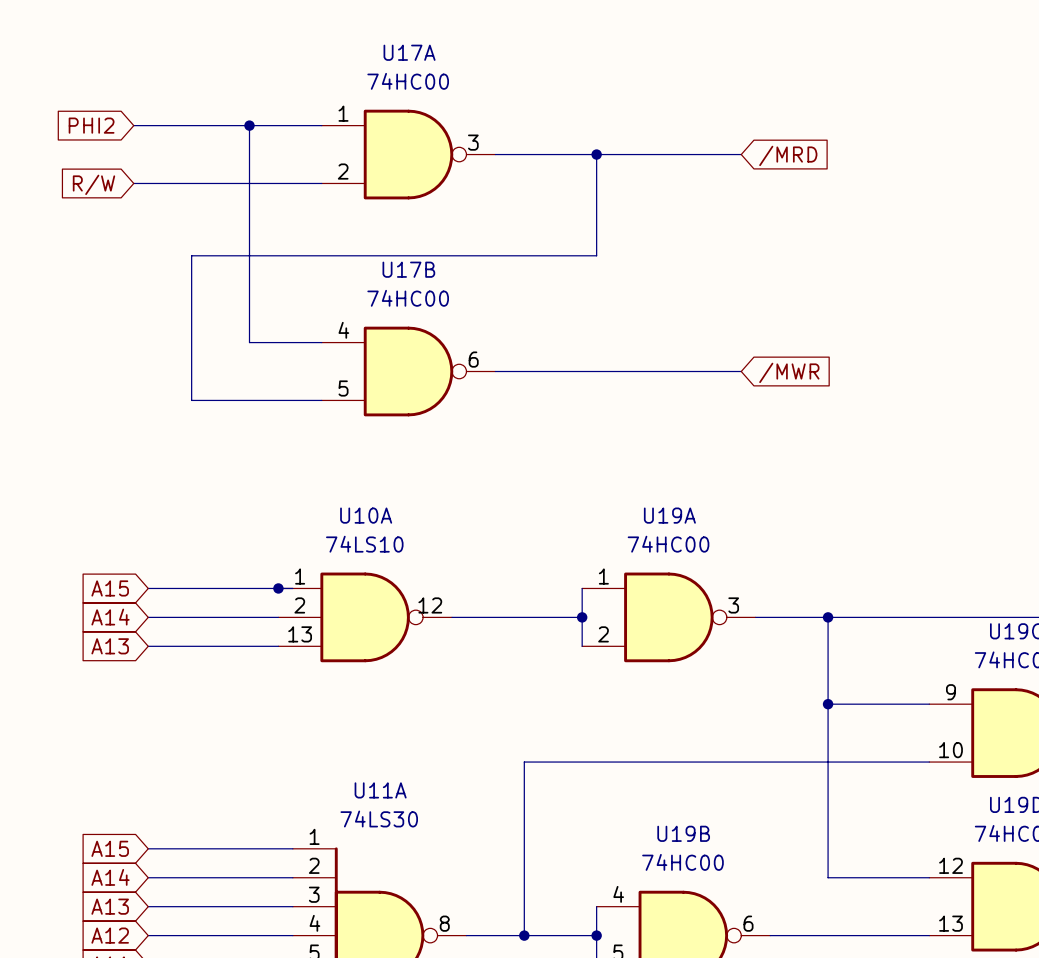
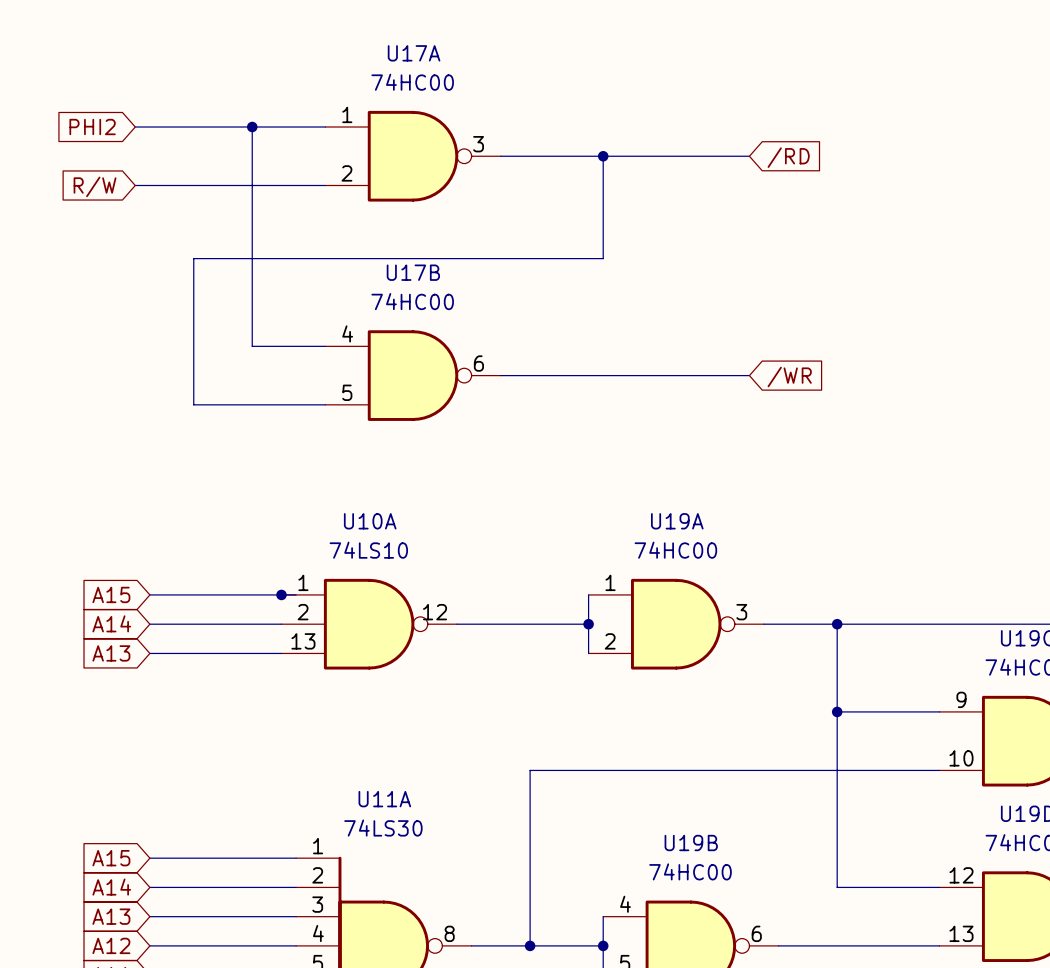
global label: /MRD (788, 155) -> /RD (788, 157)
global label: /MWR (789, 372) -> /WR (789, 376)

